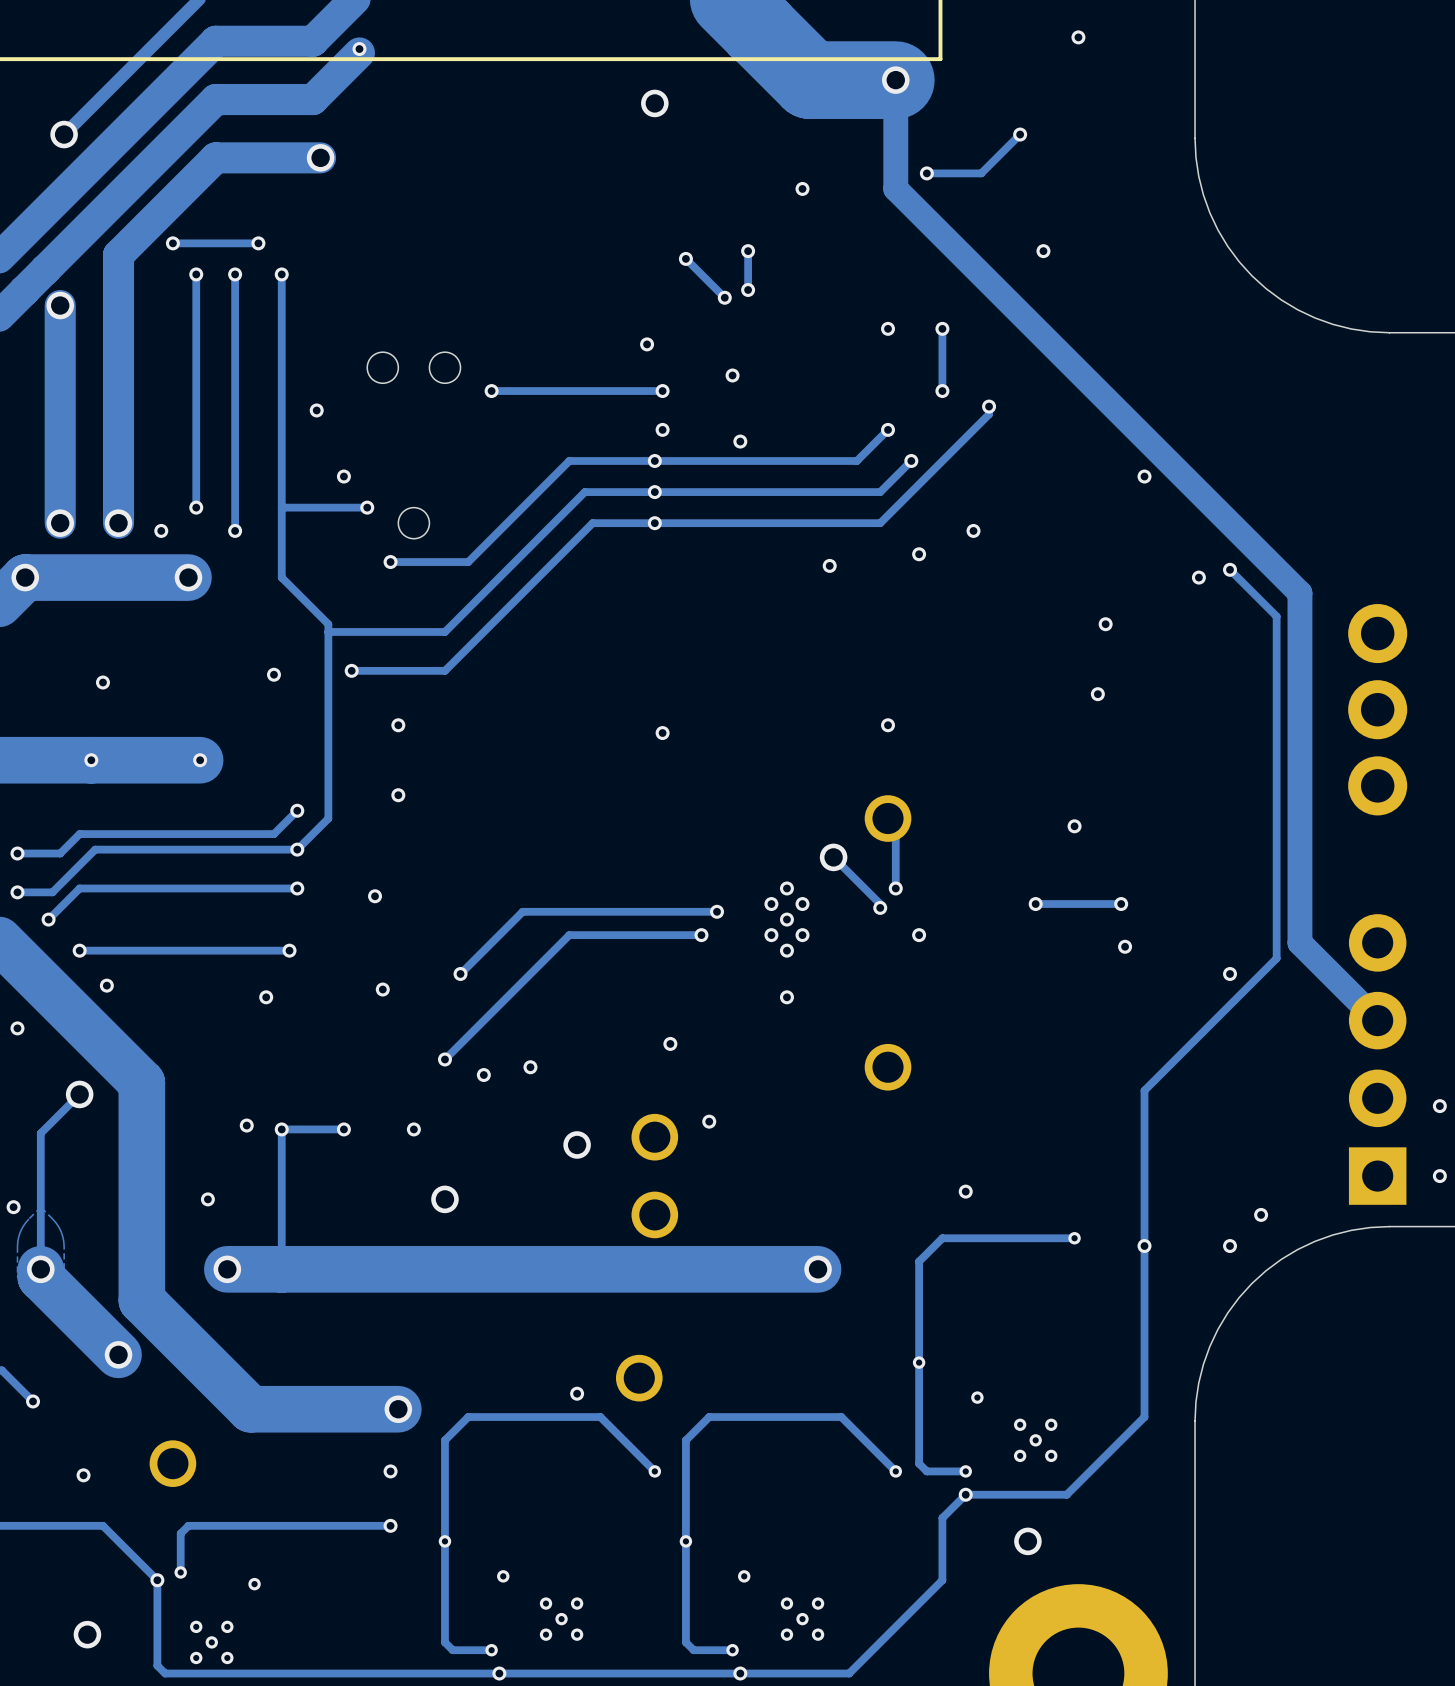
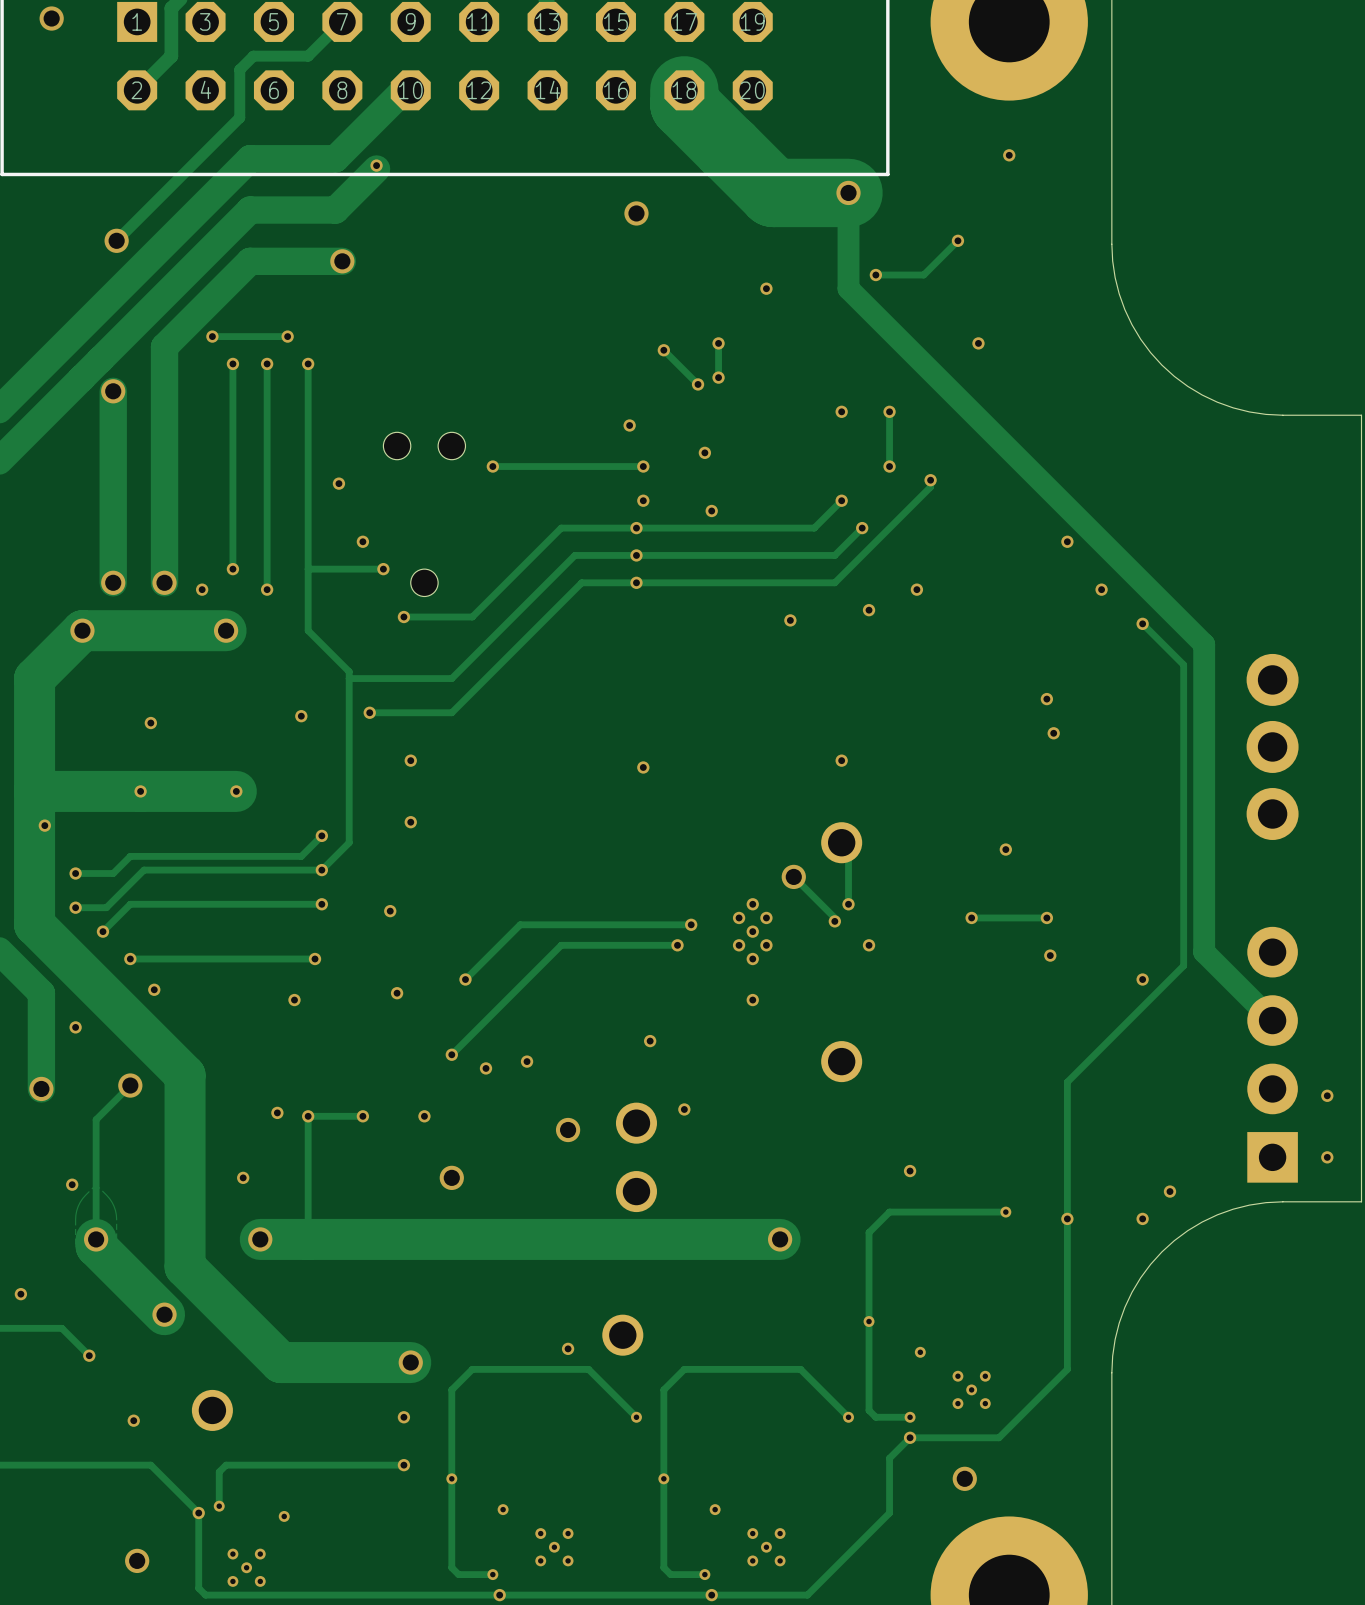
via position: (1198, 577) -> (1101, 589)
via: (1105, 624) -> none
via: none -> (1046, 699)
via: (1097, 694) -> none
via: none -> (1053, 733)

